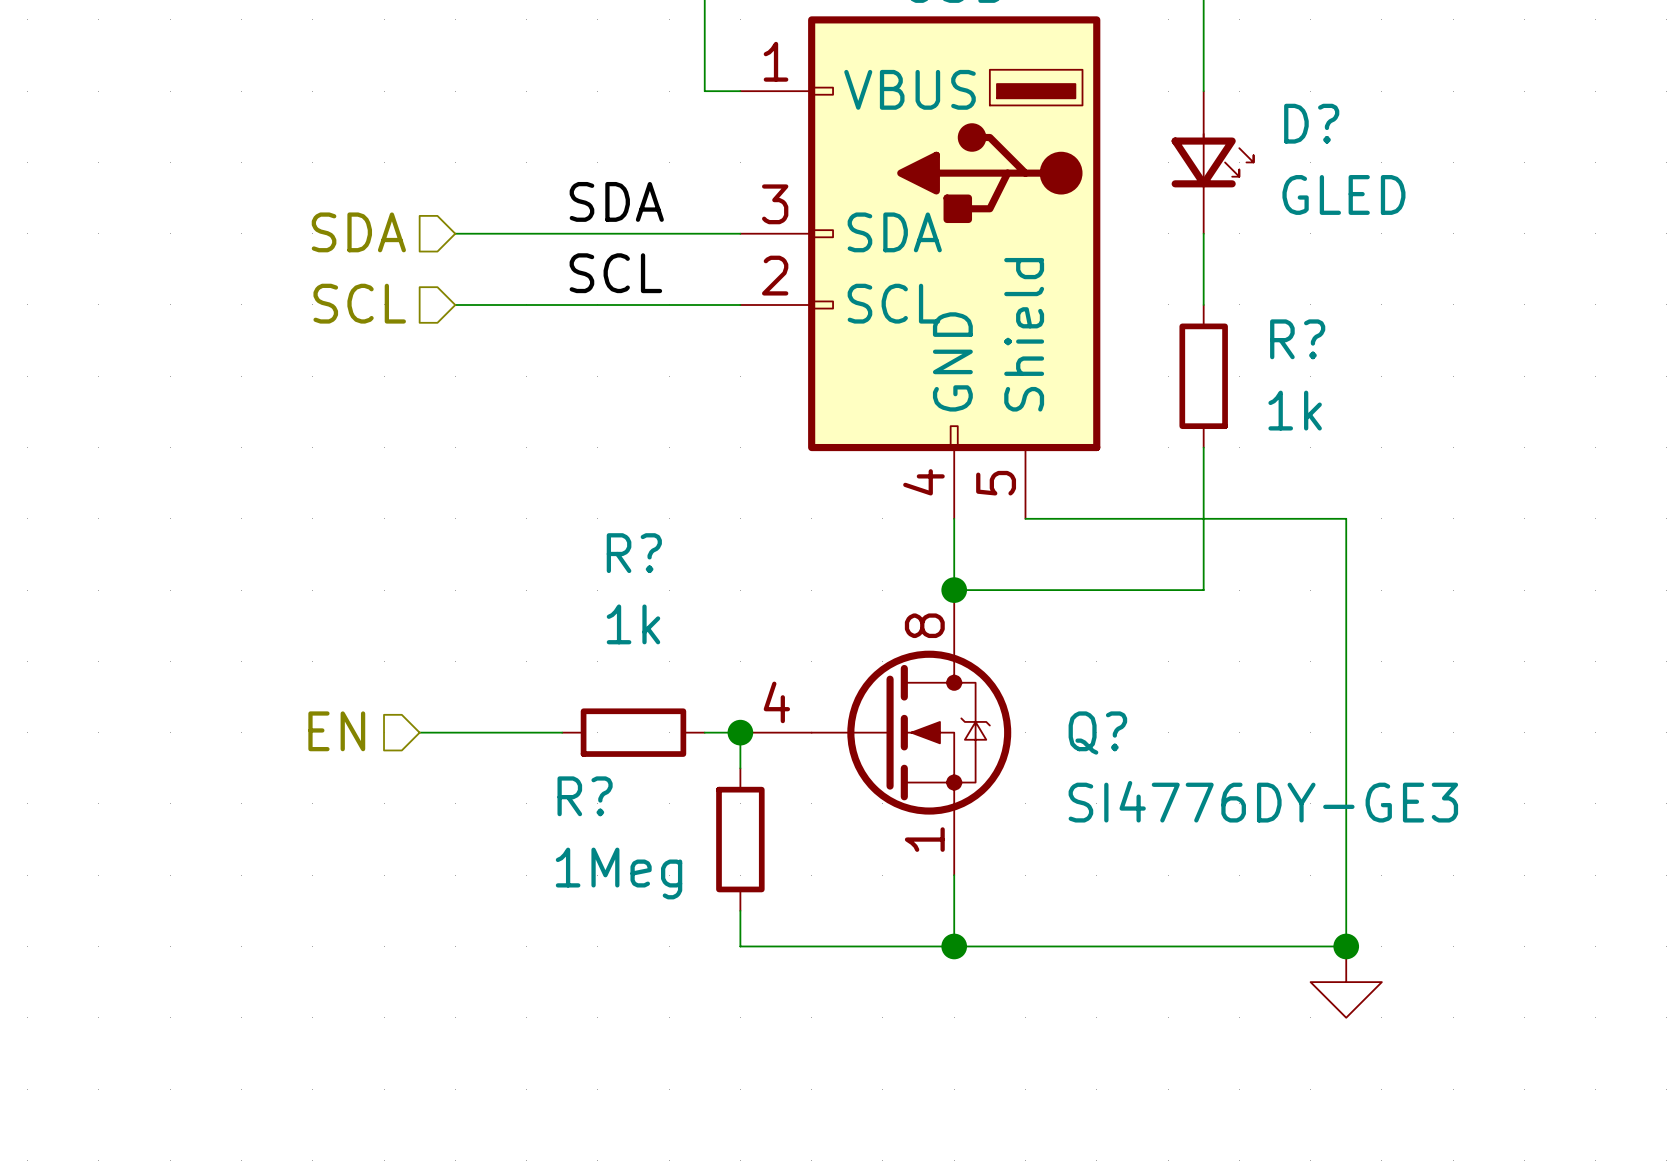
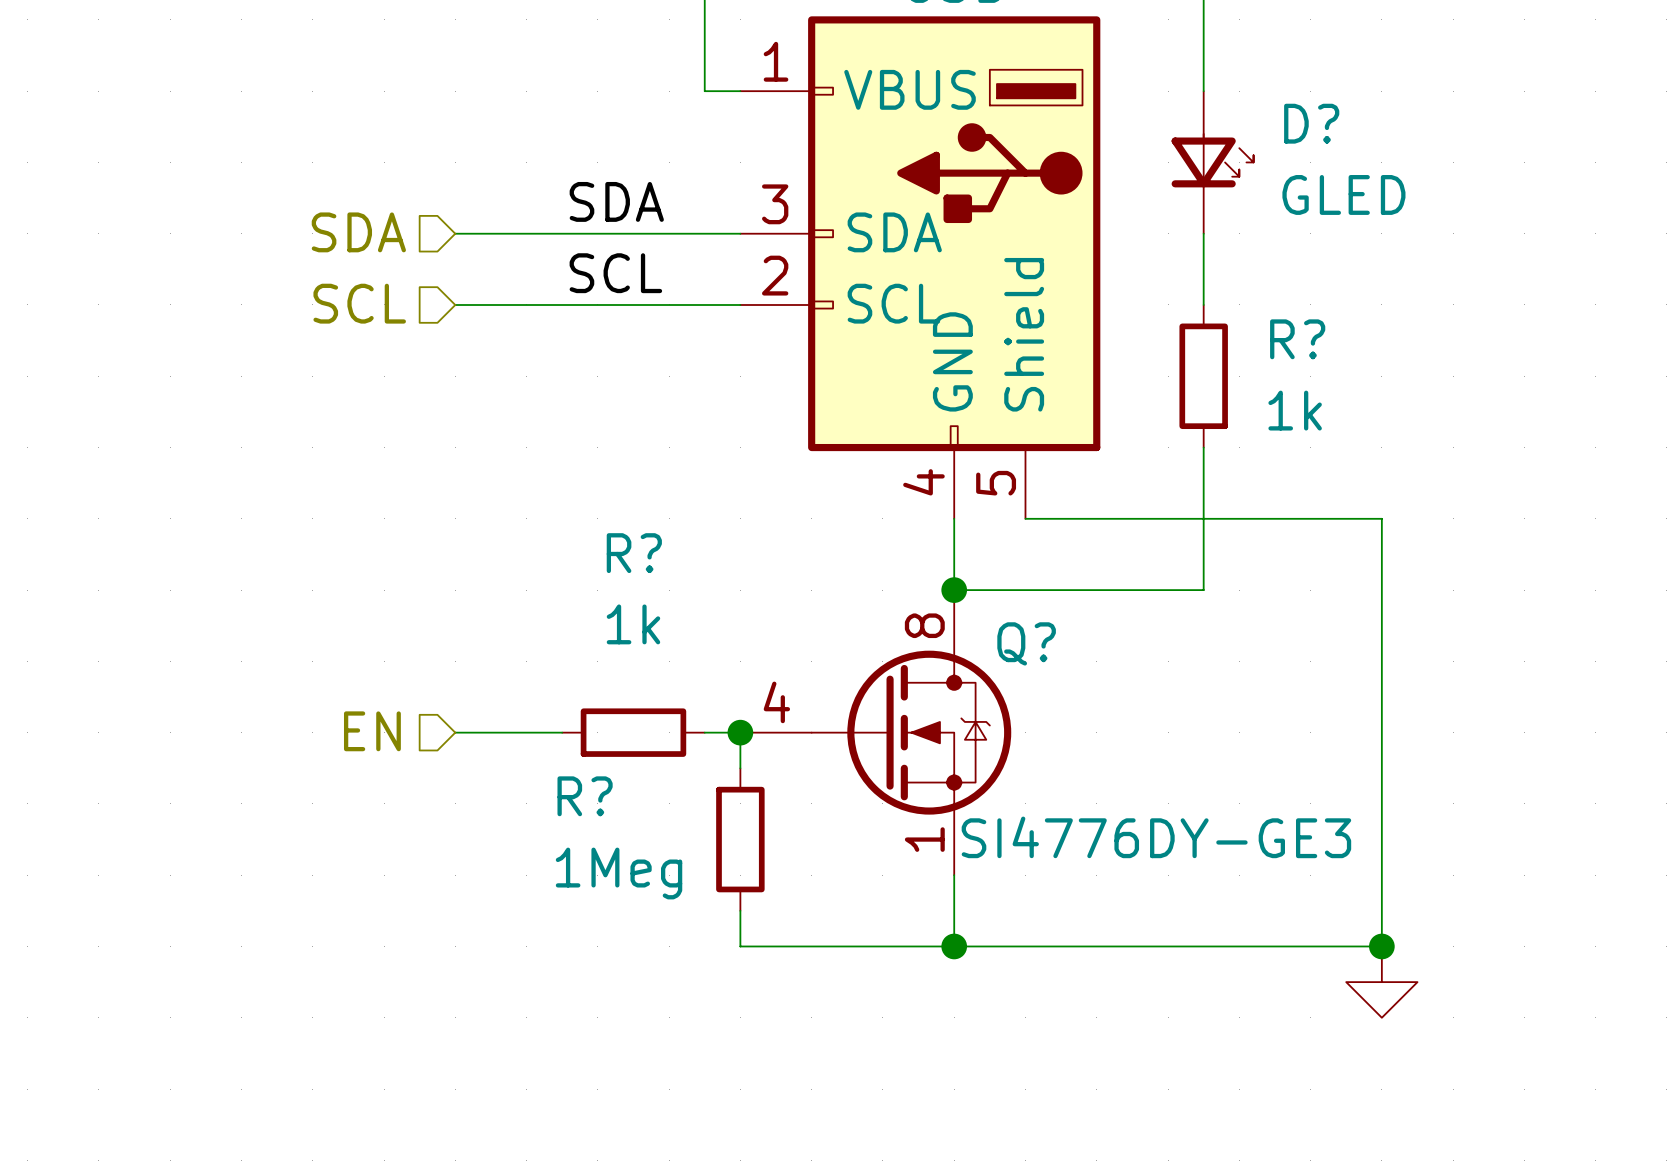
wire: (1346, 518) (1346, 946) -> (1346, 518) (1381, 518) (1381, 946) (1346, 946)
hierarchical label position: EN (336, 731) -> EN (372, 731)
wire: (419, 732) (455, 732) -> none
Q? name position: Q? (1097, 733) -> Q? (1026, 643)
Q? value position: SI4776DY-GE3 (1263, 801) -> SI4776DY-GE3 (1156, 837)
junction position: (1346, 946) -> (1381, 946)
power symbol position: (1346, 982) -> (1381, 982)

